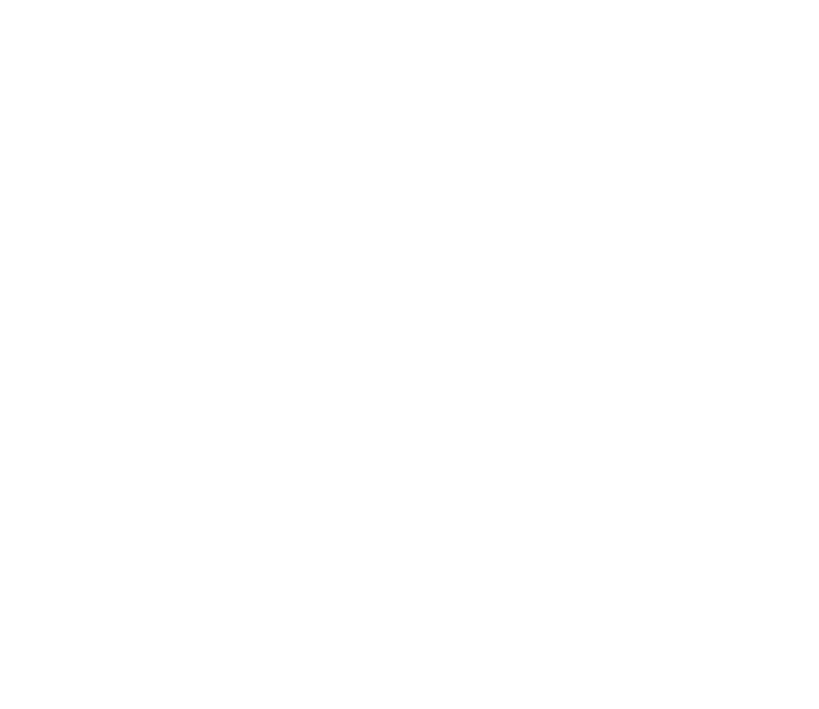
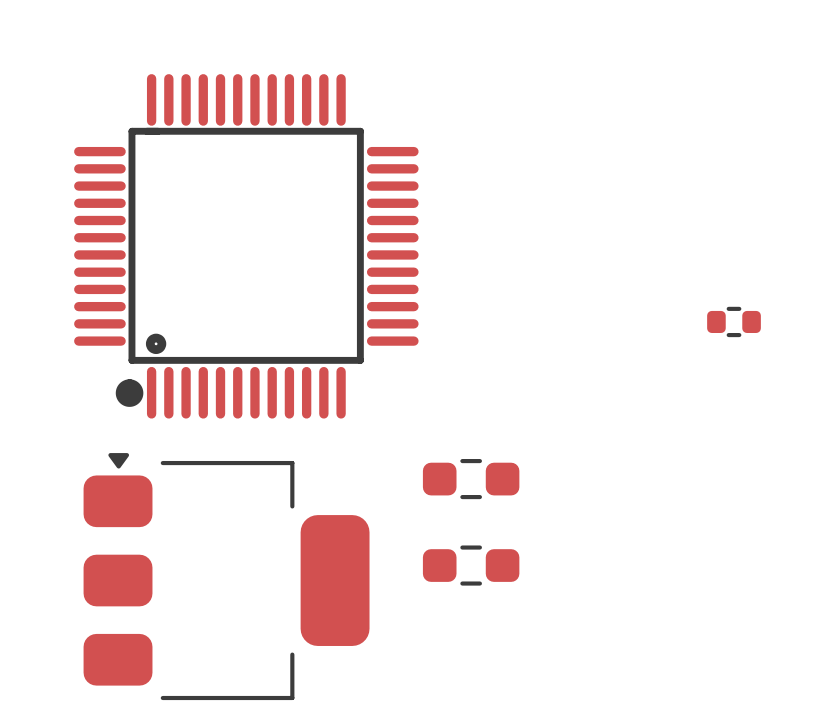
part: none -> (246, 246)
part: none -> (734, 321)
part: none -> (471, 479)
part: none -> (471, 565)
part: none -> (226, 576)

